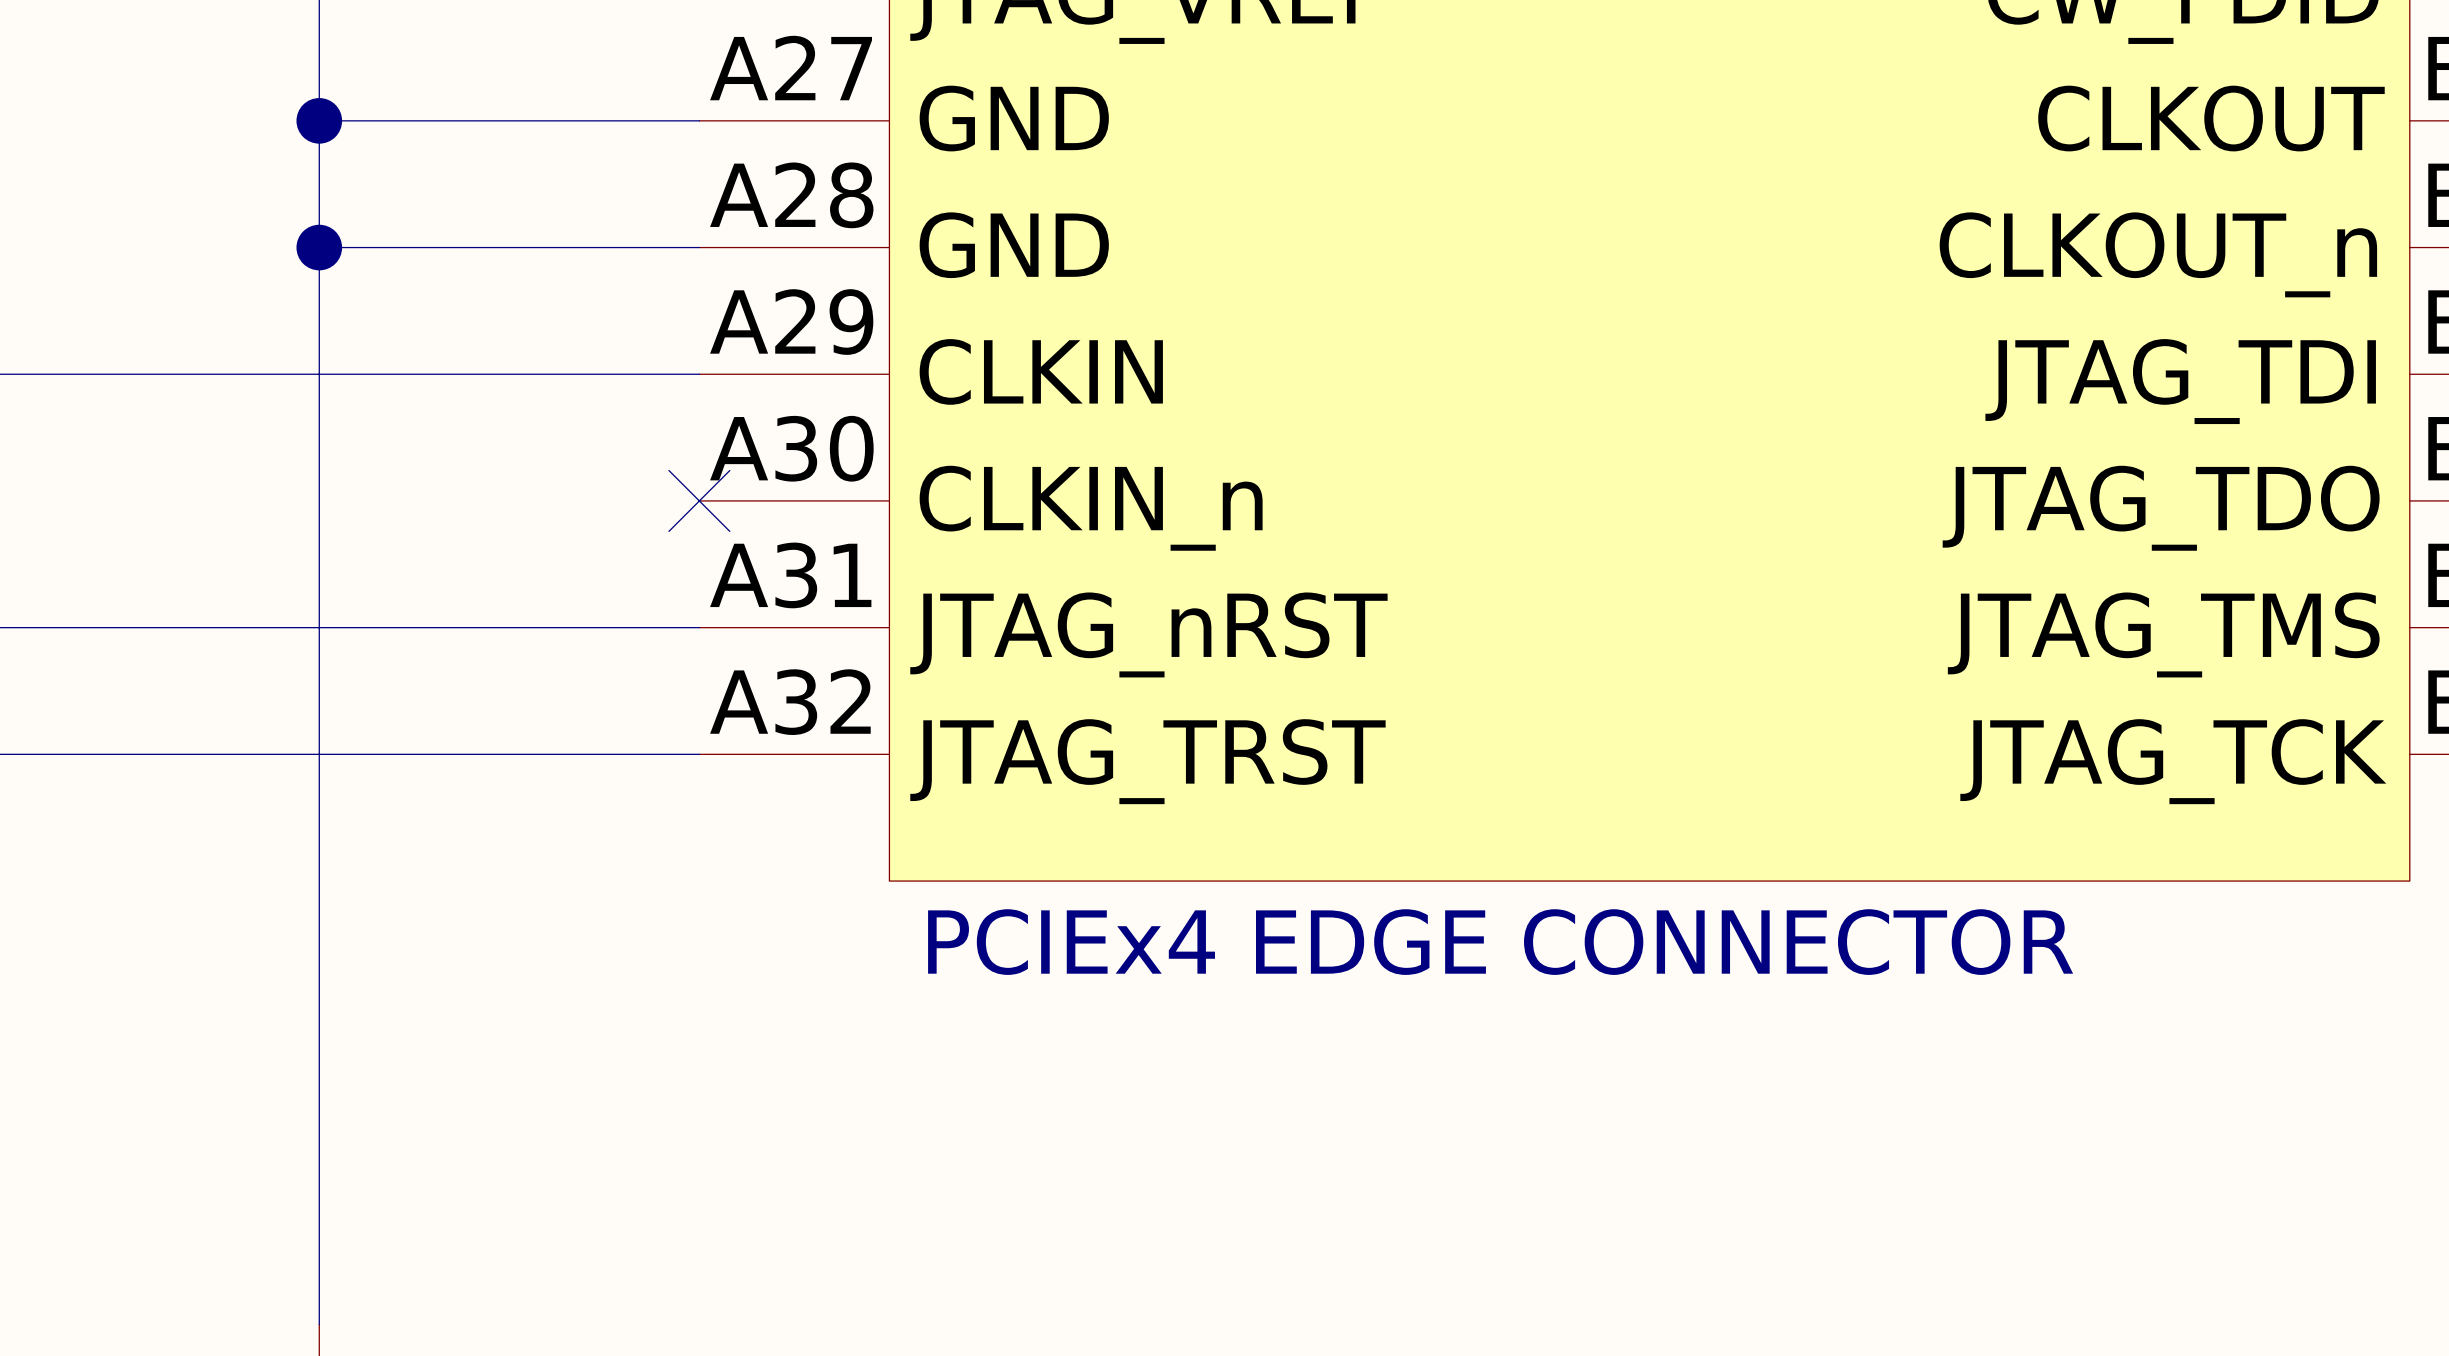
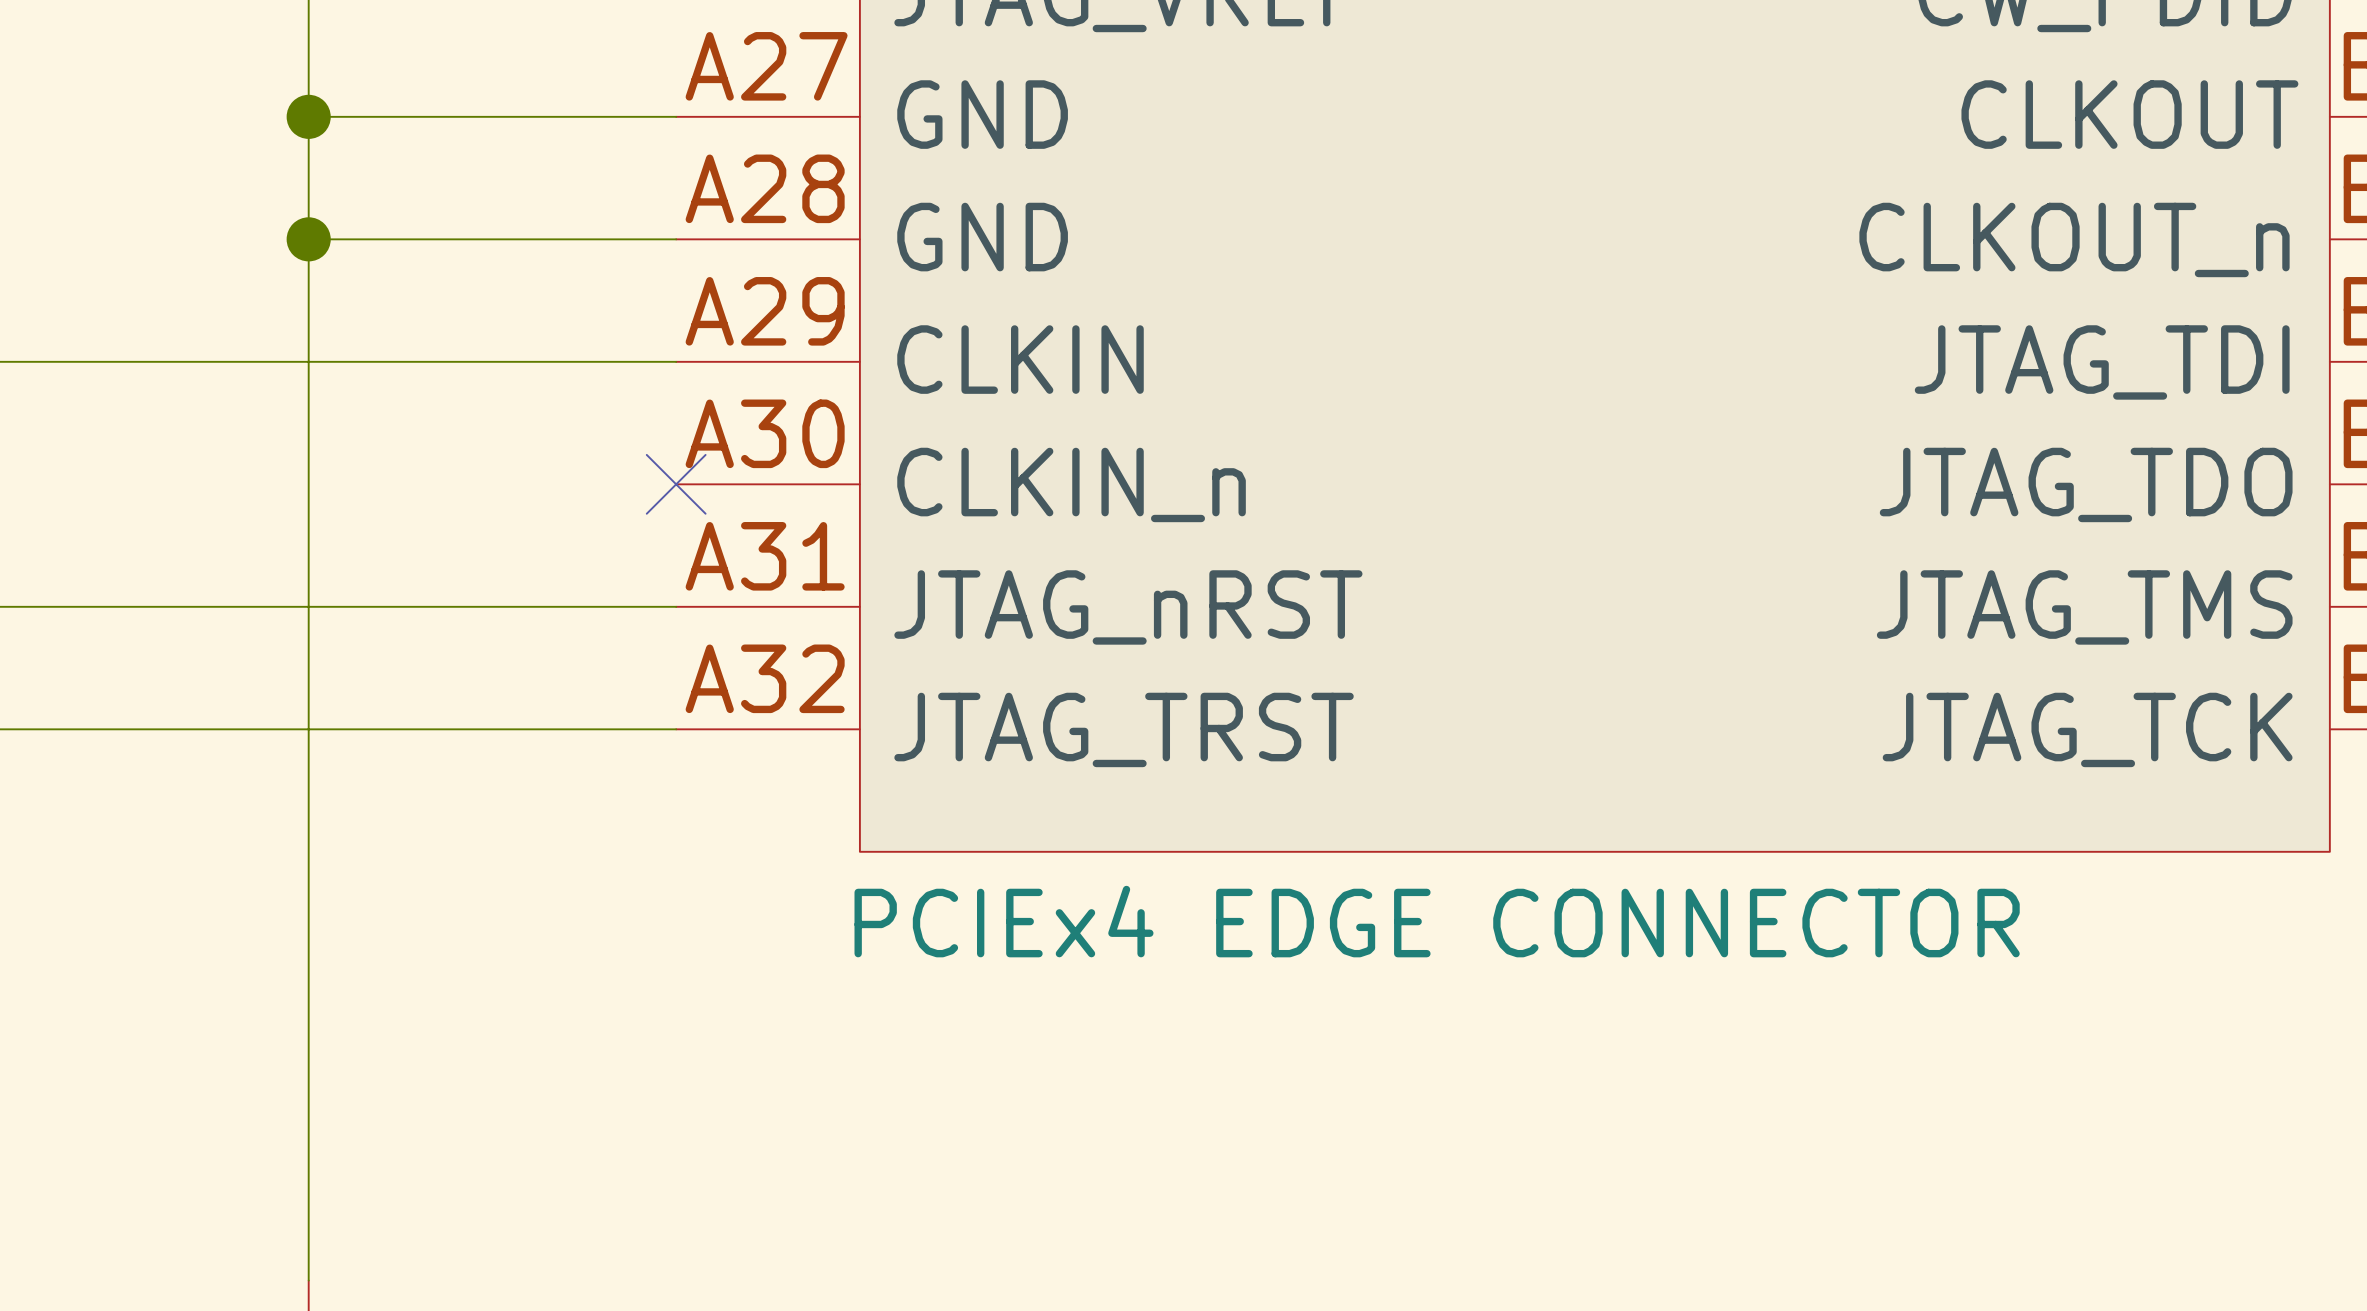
part value position: PCIEx4 EDGE CONNECTOR (1500, 942) -> PCIEx4 EDGE CONNECTOR (1437, 921)

